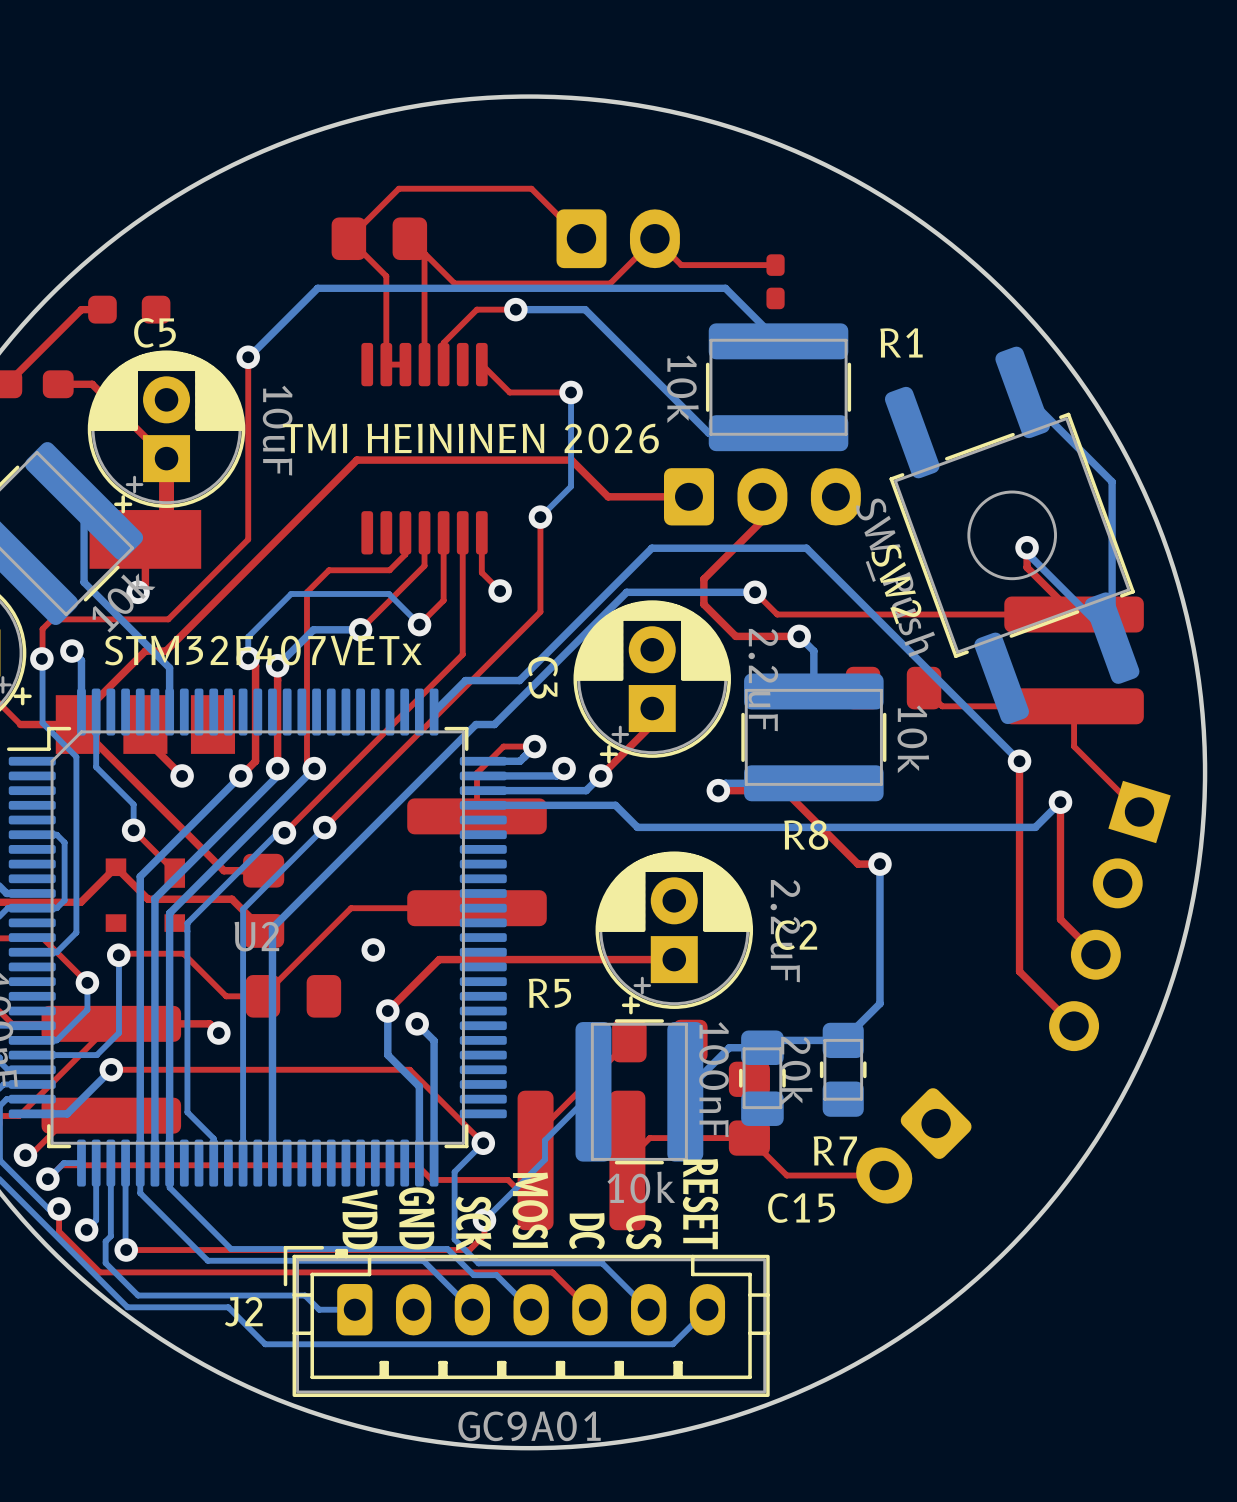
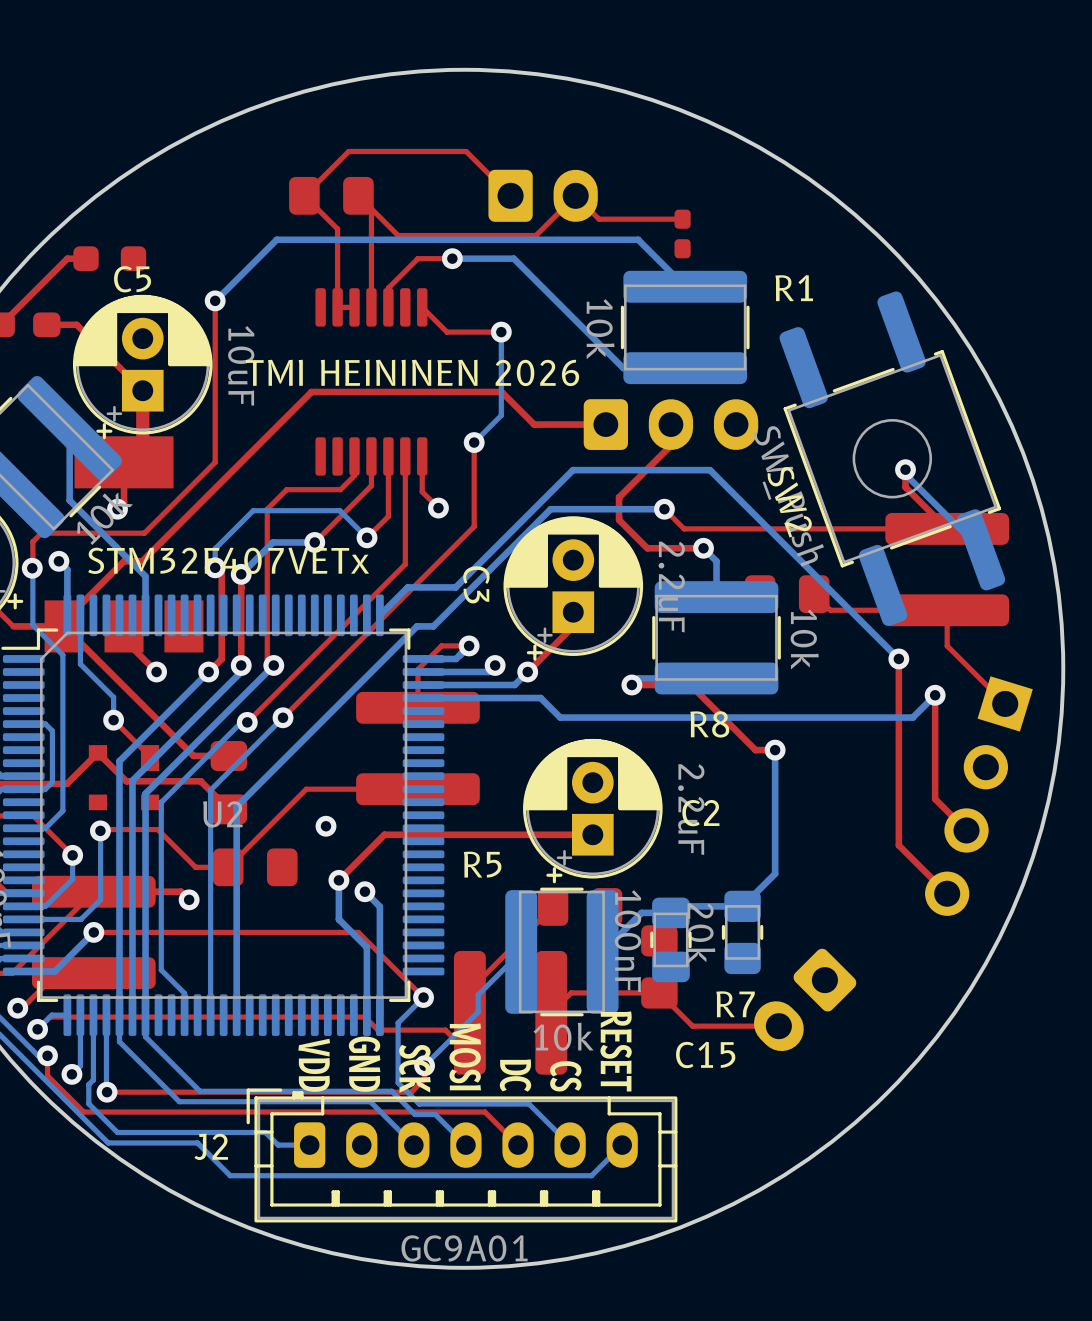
bottom track: (1022, 392) (1112, 481) (1112, 638) -> none

